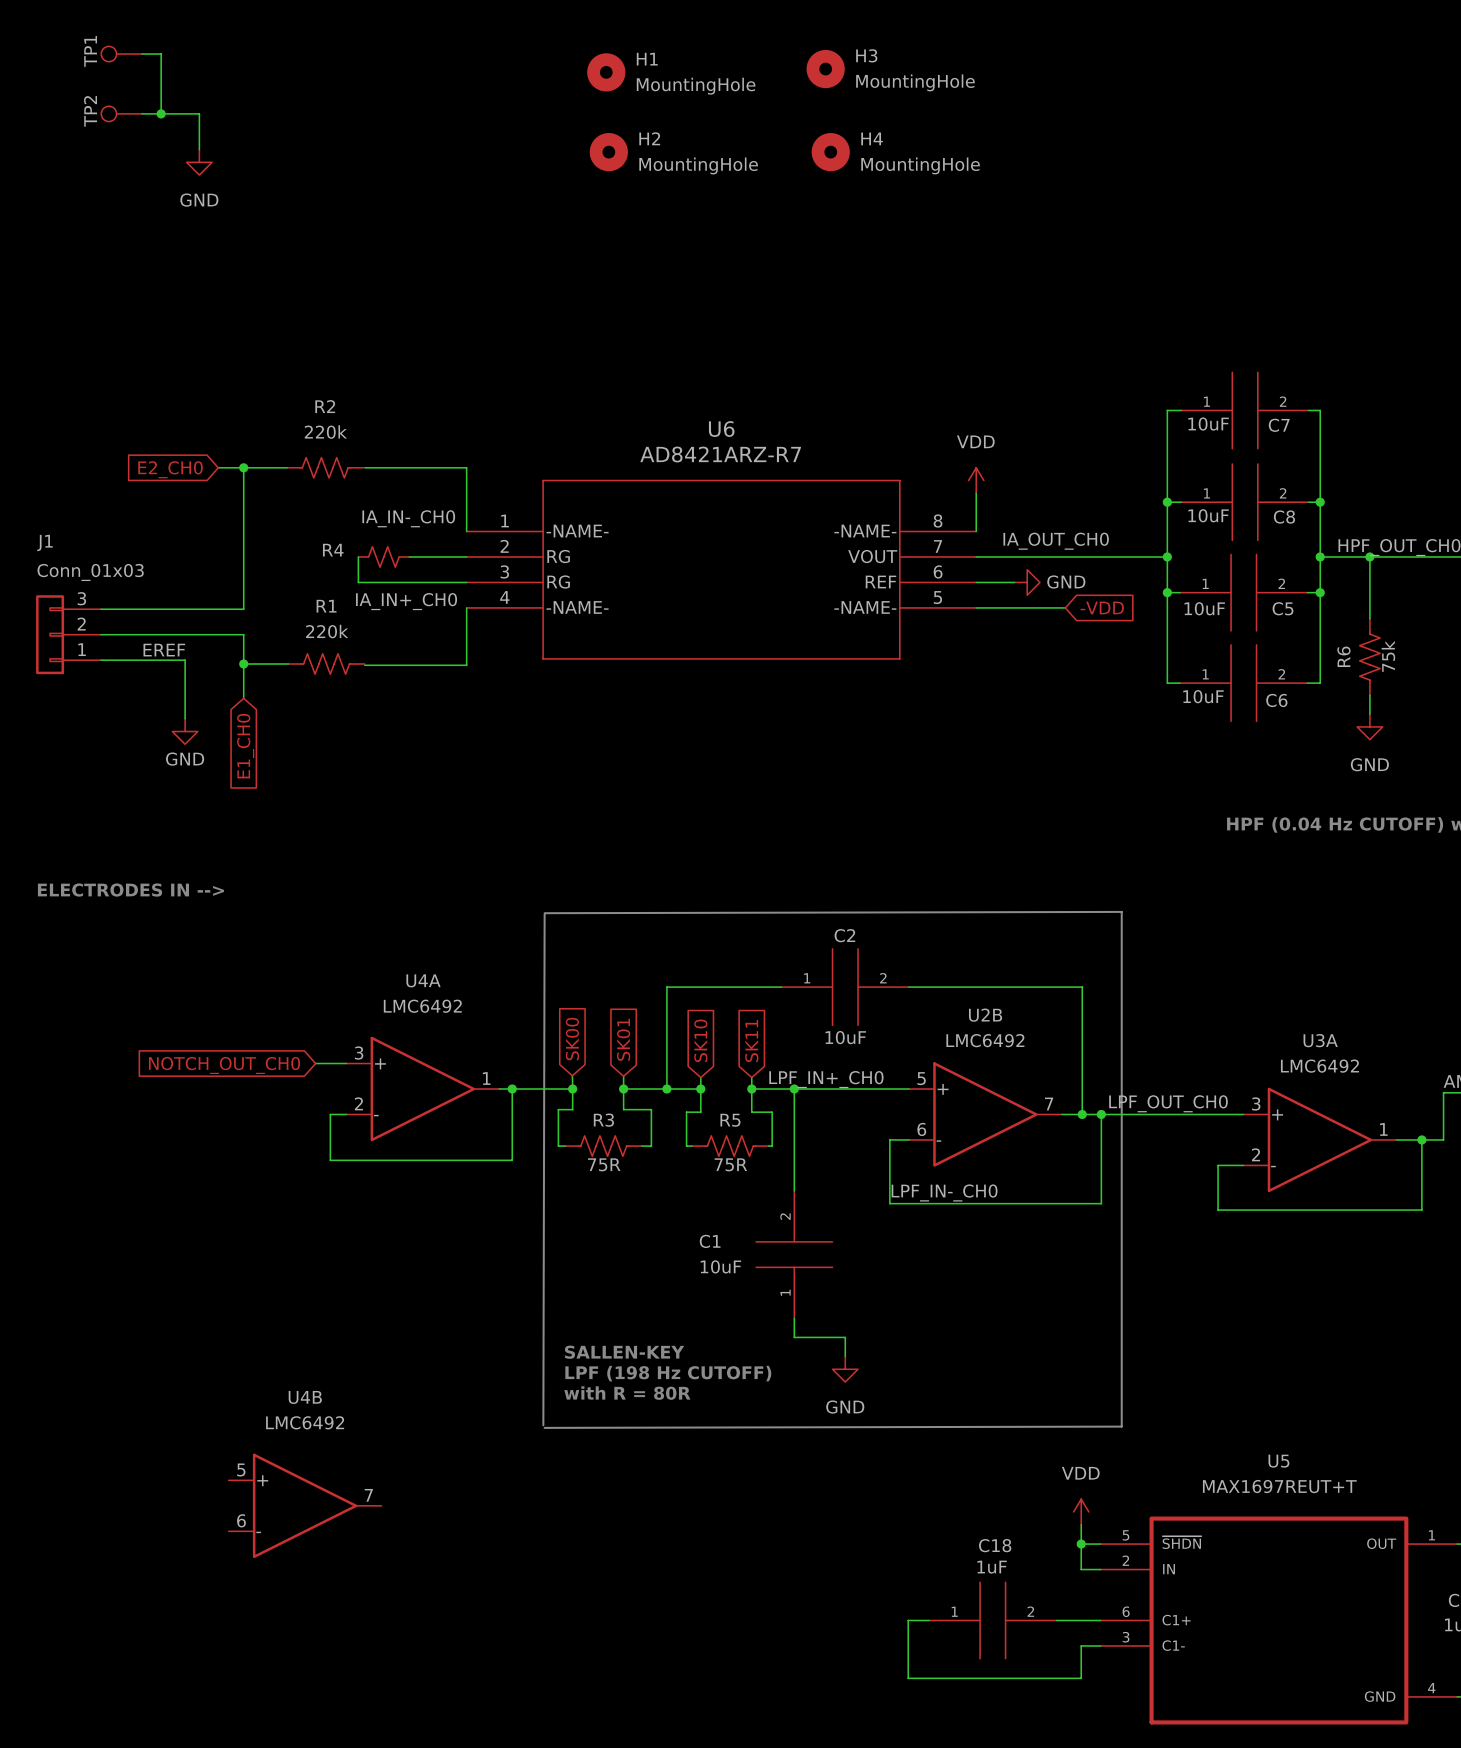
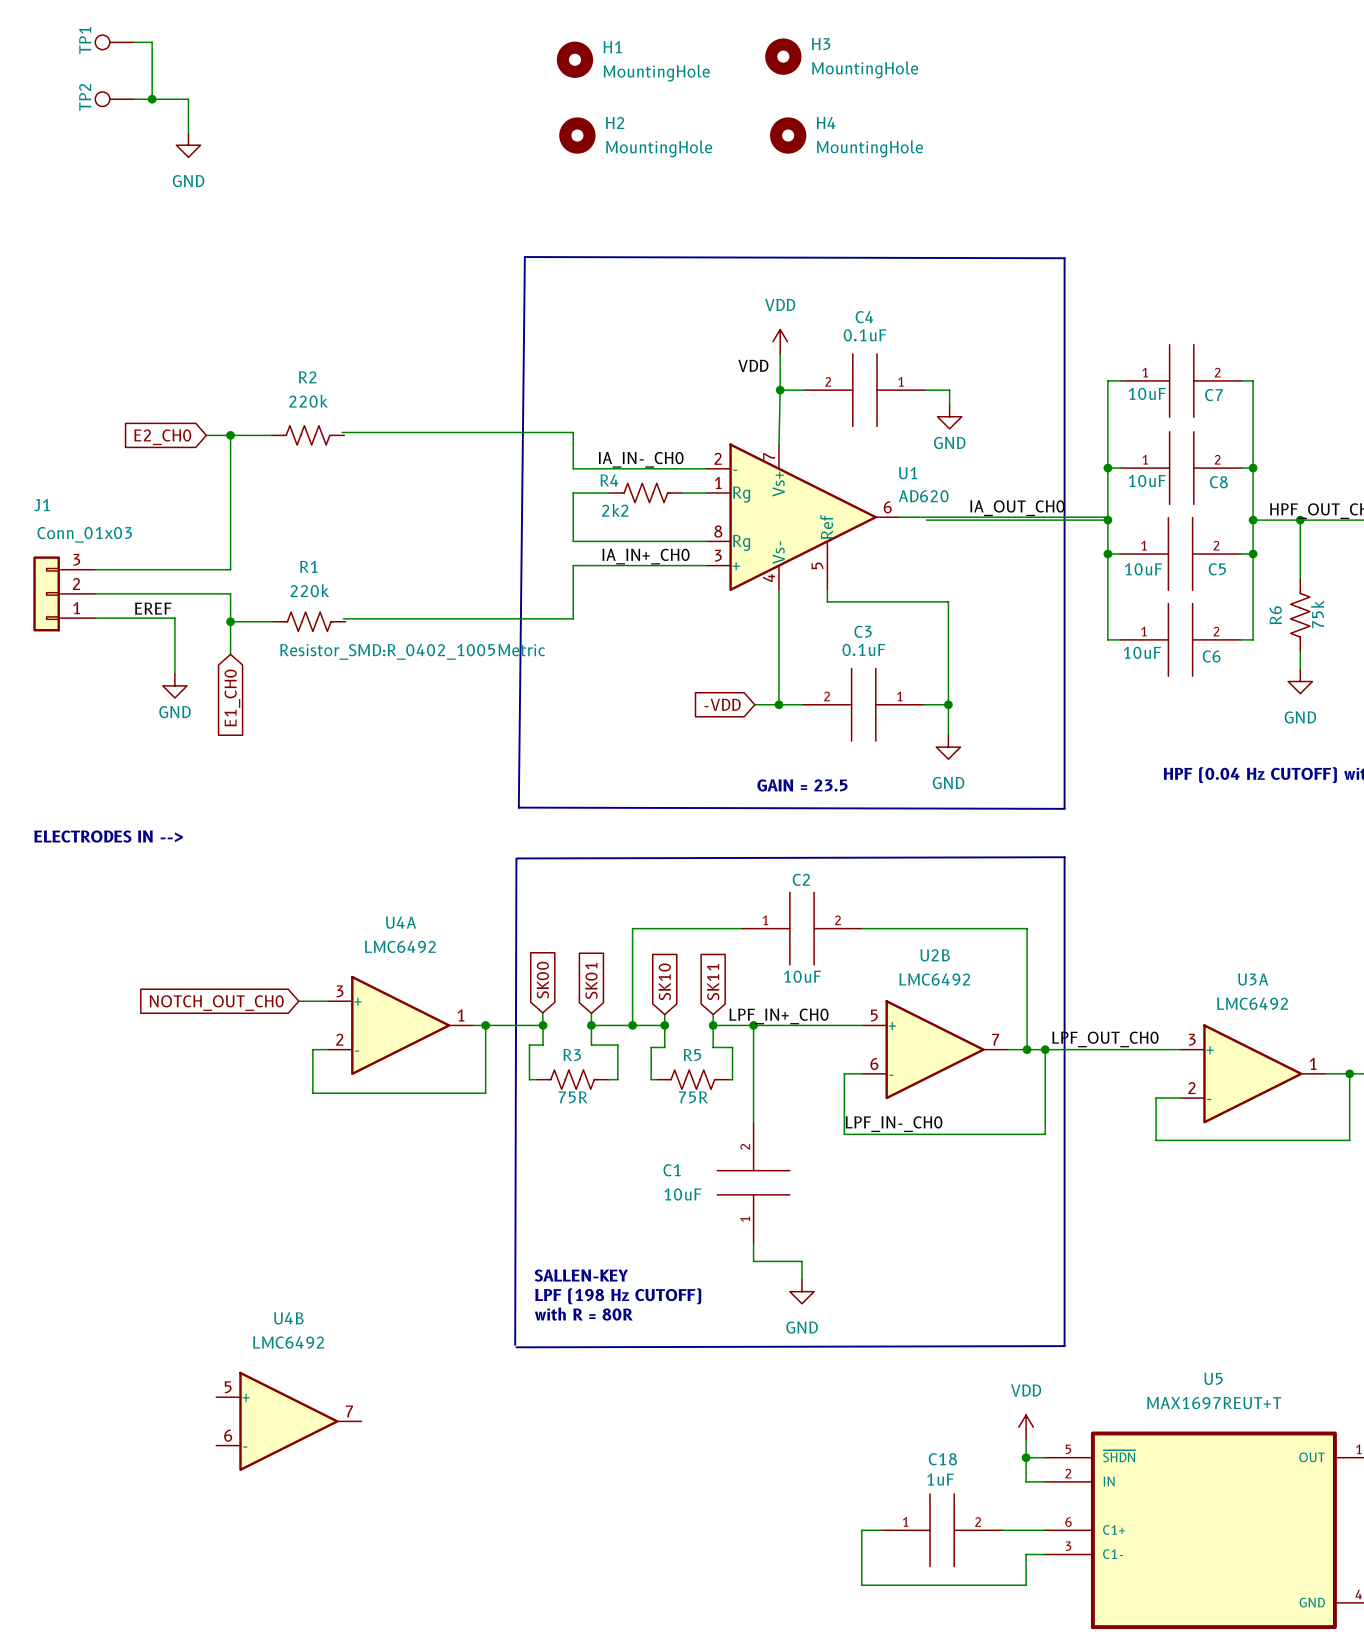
line: none -> (524, 257) (1064, 258) (1064, 808) (518, 807) (524, 257)
label: none -> VDD (753, 365)
wire: none -> (780, 390) (804, 390)
wire: none -> (780, 390) (778, 444)
junction: none -> (780, 390)
C4: none -> 0.1uF (864, 390)
wire: none -> (925, 390) (949, 390) (949, 404)
power symbol: none -> GND (949, 416)
wire: none -> (342, 432) (573, 432) (573, 468) (706, 468)
wire: (364, 467) (466, 467) (466, 531) -> none
power symbol position: VDD (976, 480) -> VDD (780, 341)
label: none -> IA_IN-_CH0 (641, 459)
wire: (976, 493) (976, 531) -> (780, 353) (780, 390)
label: IA_IN-_CH0 (408, 518) -> none
wire: none -> (609, 493) (573, 493) (573, 541) (706, 541)
wire: none -> (682, 493) (706, 493)
label position: IA_OUT_CH0 (1056, 541) -> IA_OUT_CH0 (1017, 508)
R4 symbol: [358, 546, 410, 568] -> [609, 483, 683, 503]
R4 value: none -> 2k2 (615, 510)
U1: none -> AD620 (803, 517)
wire: none -> (900, 517) (1105, 517)
wire: (358, 556) (358, 582) (466, 582) -> none
wire: (409, 556) (466, 556) -> none
U6: AD8421ARZ-R7 (721, 569) -> none
wire: (976, 582) (1014, 582) -> none
power symbol: GND (1027, 582) -> none
label: none -> IA_IN+_CH0 (645, 556)
label: IA_IN+_CH0 (406, 601) -> none
wire: none -> (706, 565) (573, 565) (573, 618) (343, 618)
wire: (466, 607) (466, 665) (364, 665) -> none
wire: (976, 607) (1065, 607) -> none
global label: -VDD (1102, 607) -> none
wire: none -> (778, 589) (778, 704)
wire: none -> (827, 589) (827, 601) (948, 601) (948, 735)
R1 text: none -> Resistor_SMD:R_0402_1005Metric (412, 651)
global label: none -> -VDD (722, 704)
wire: none -> (754, 704) (803, 704)
junction: none -> (778, 704)
C3: none -> 0.1uF (863, 704)
wire: none -> (924, 704) (948, 704)
junction: none -> (948, 704)
power symbol: none -> GND (948, 747)
text: none -> GAIN = 23.5 (802, 785)

